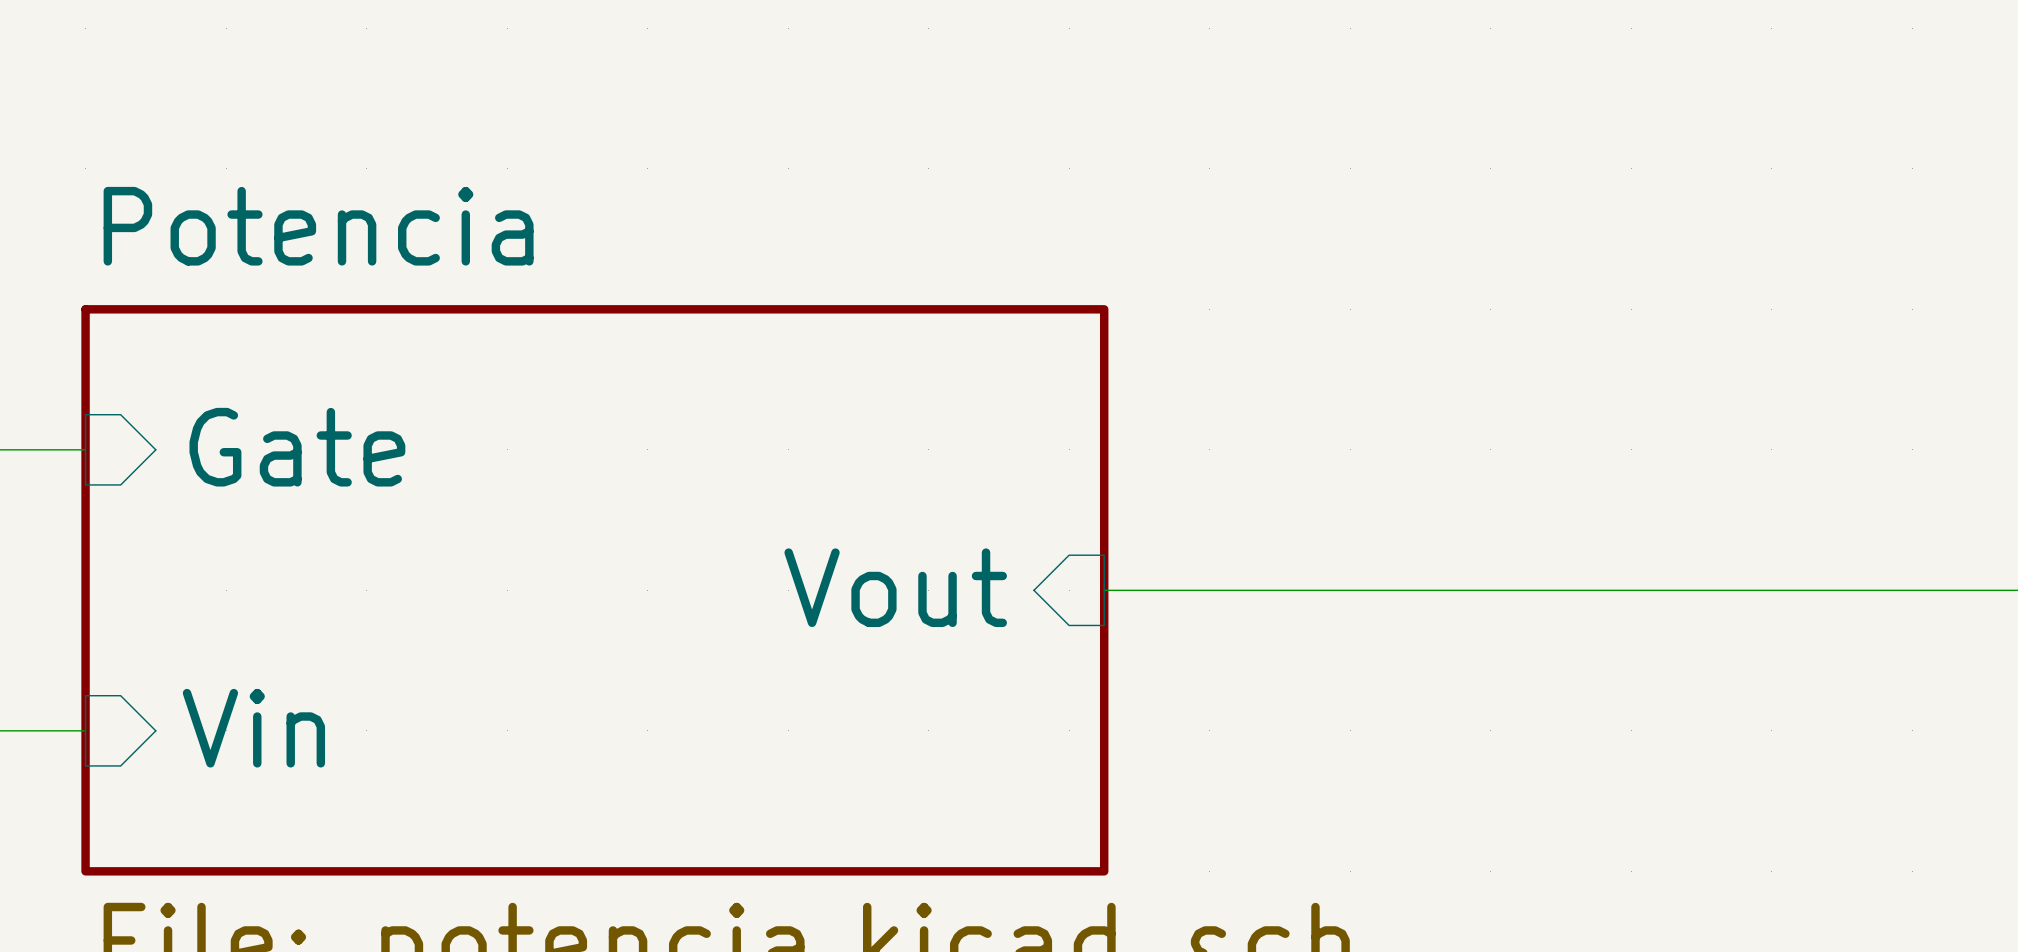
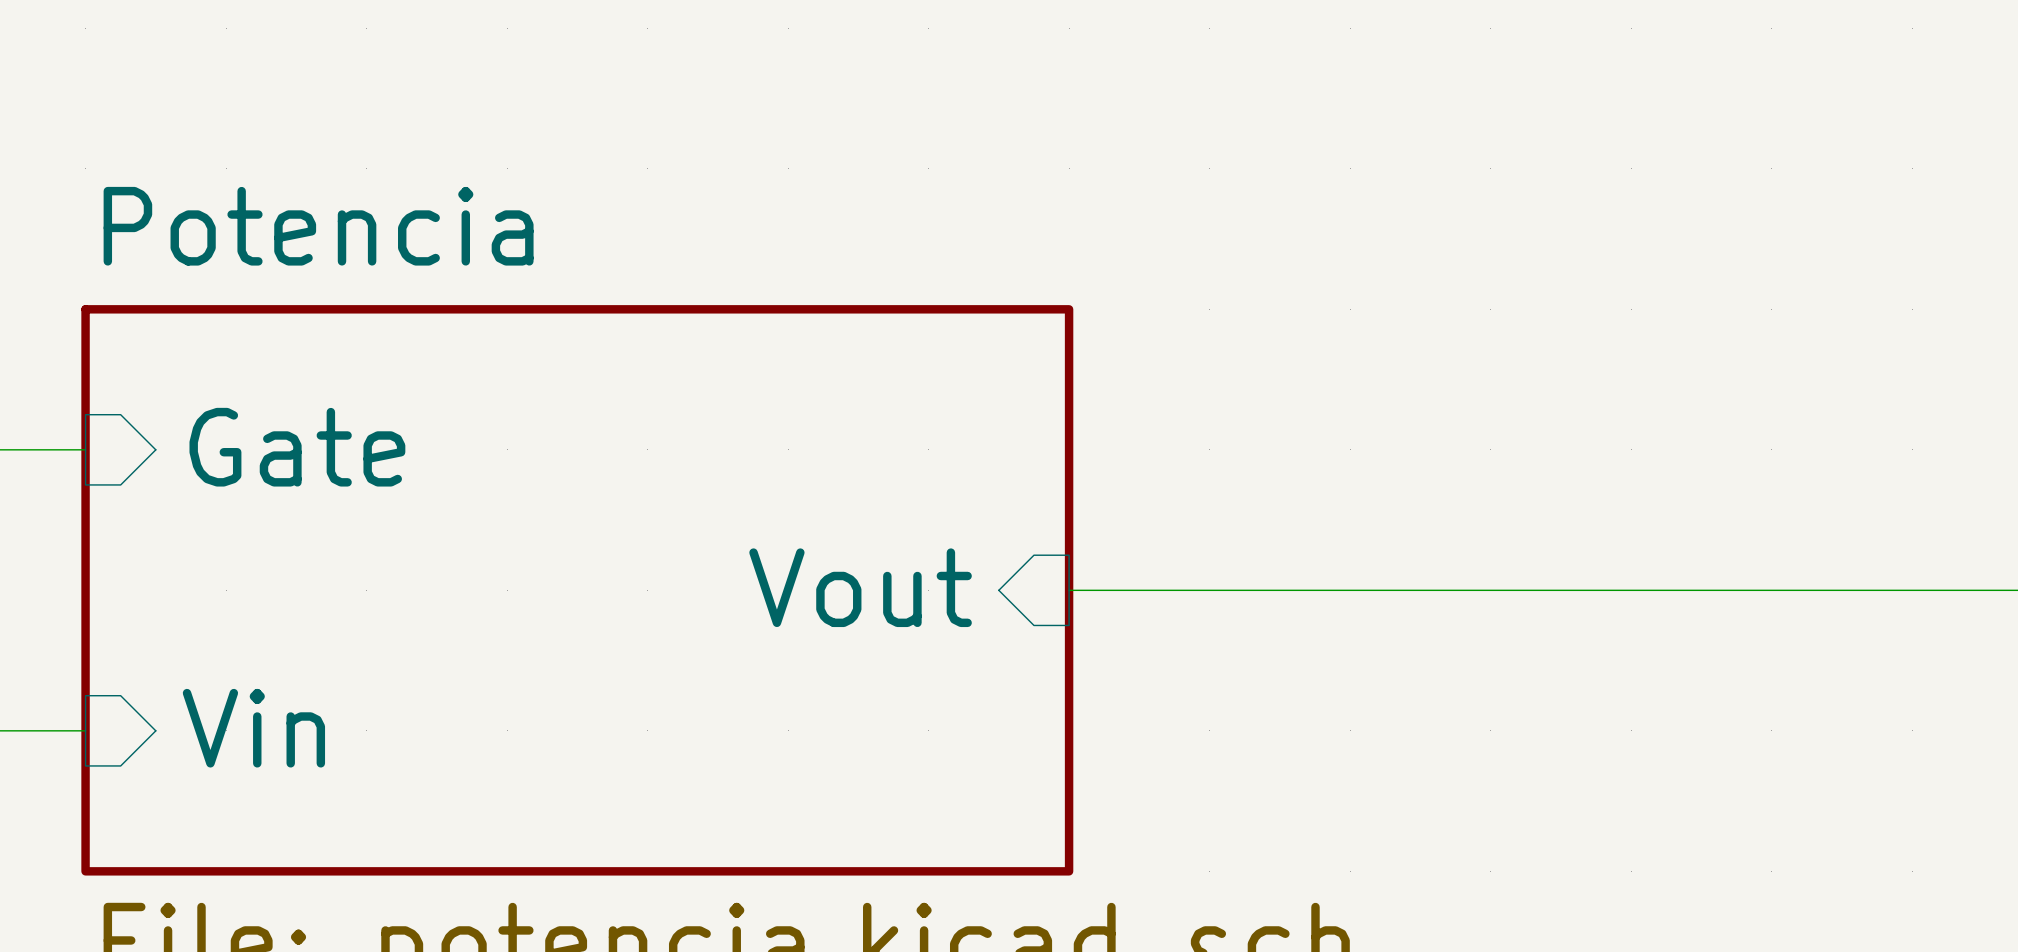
sheet Potencia shape: [81, 305, 1109, 876] -> [81, 305, 1074, 876]
sheet pin position: Vout (895, 587) -> Vout (860, 587)
wire: none -> (1069, 590) (1104, 590)

